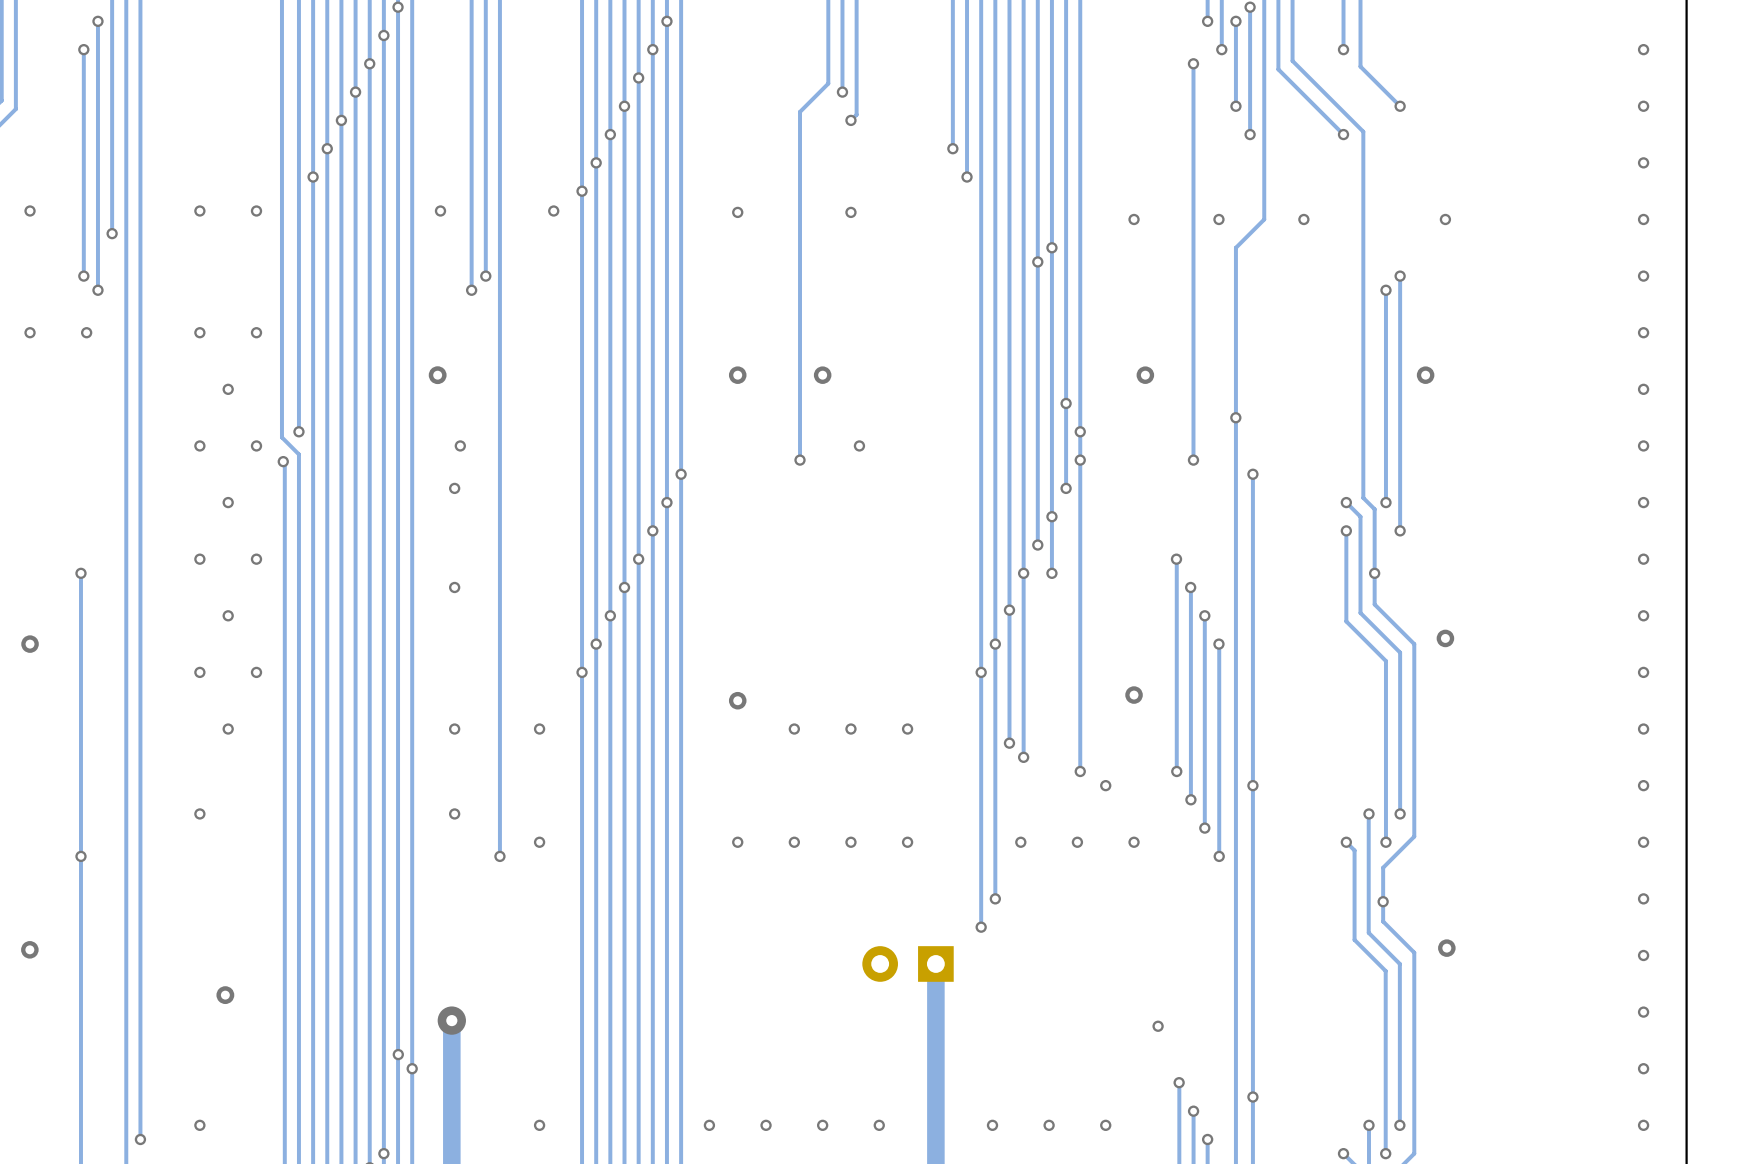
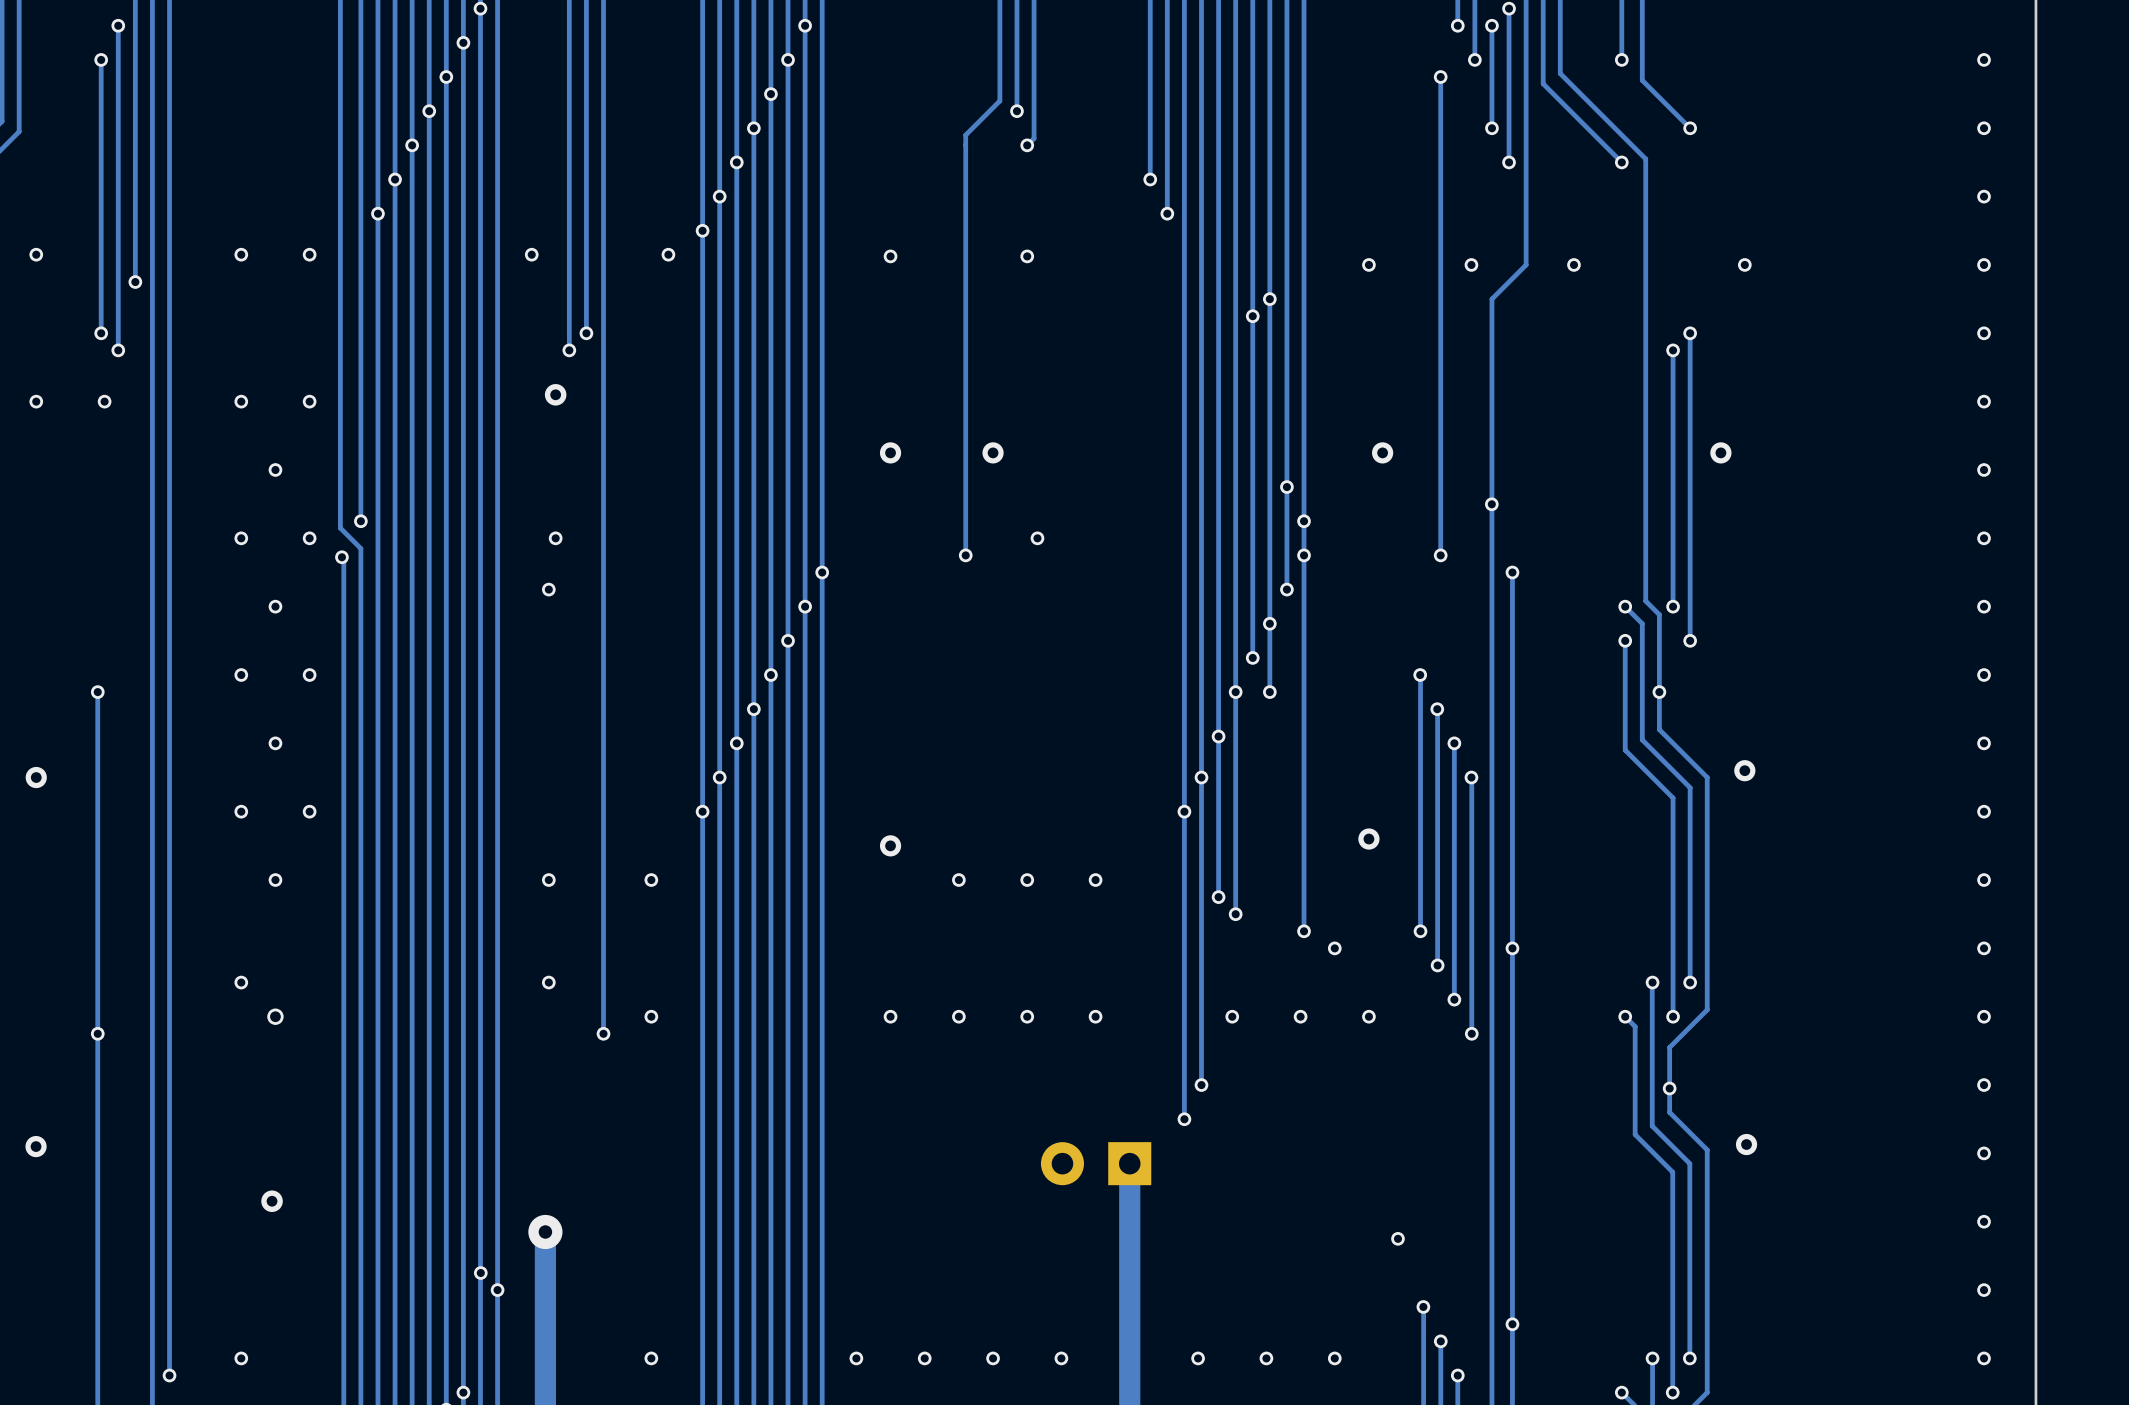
via position: (437, 375) -> (555, 394)
via: (454, 587) -> none
via: none -> (275, 1016)

